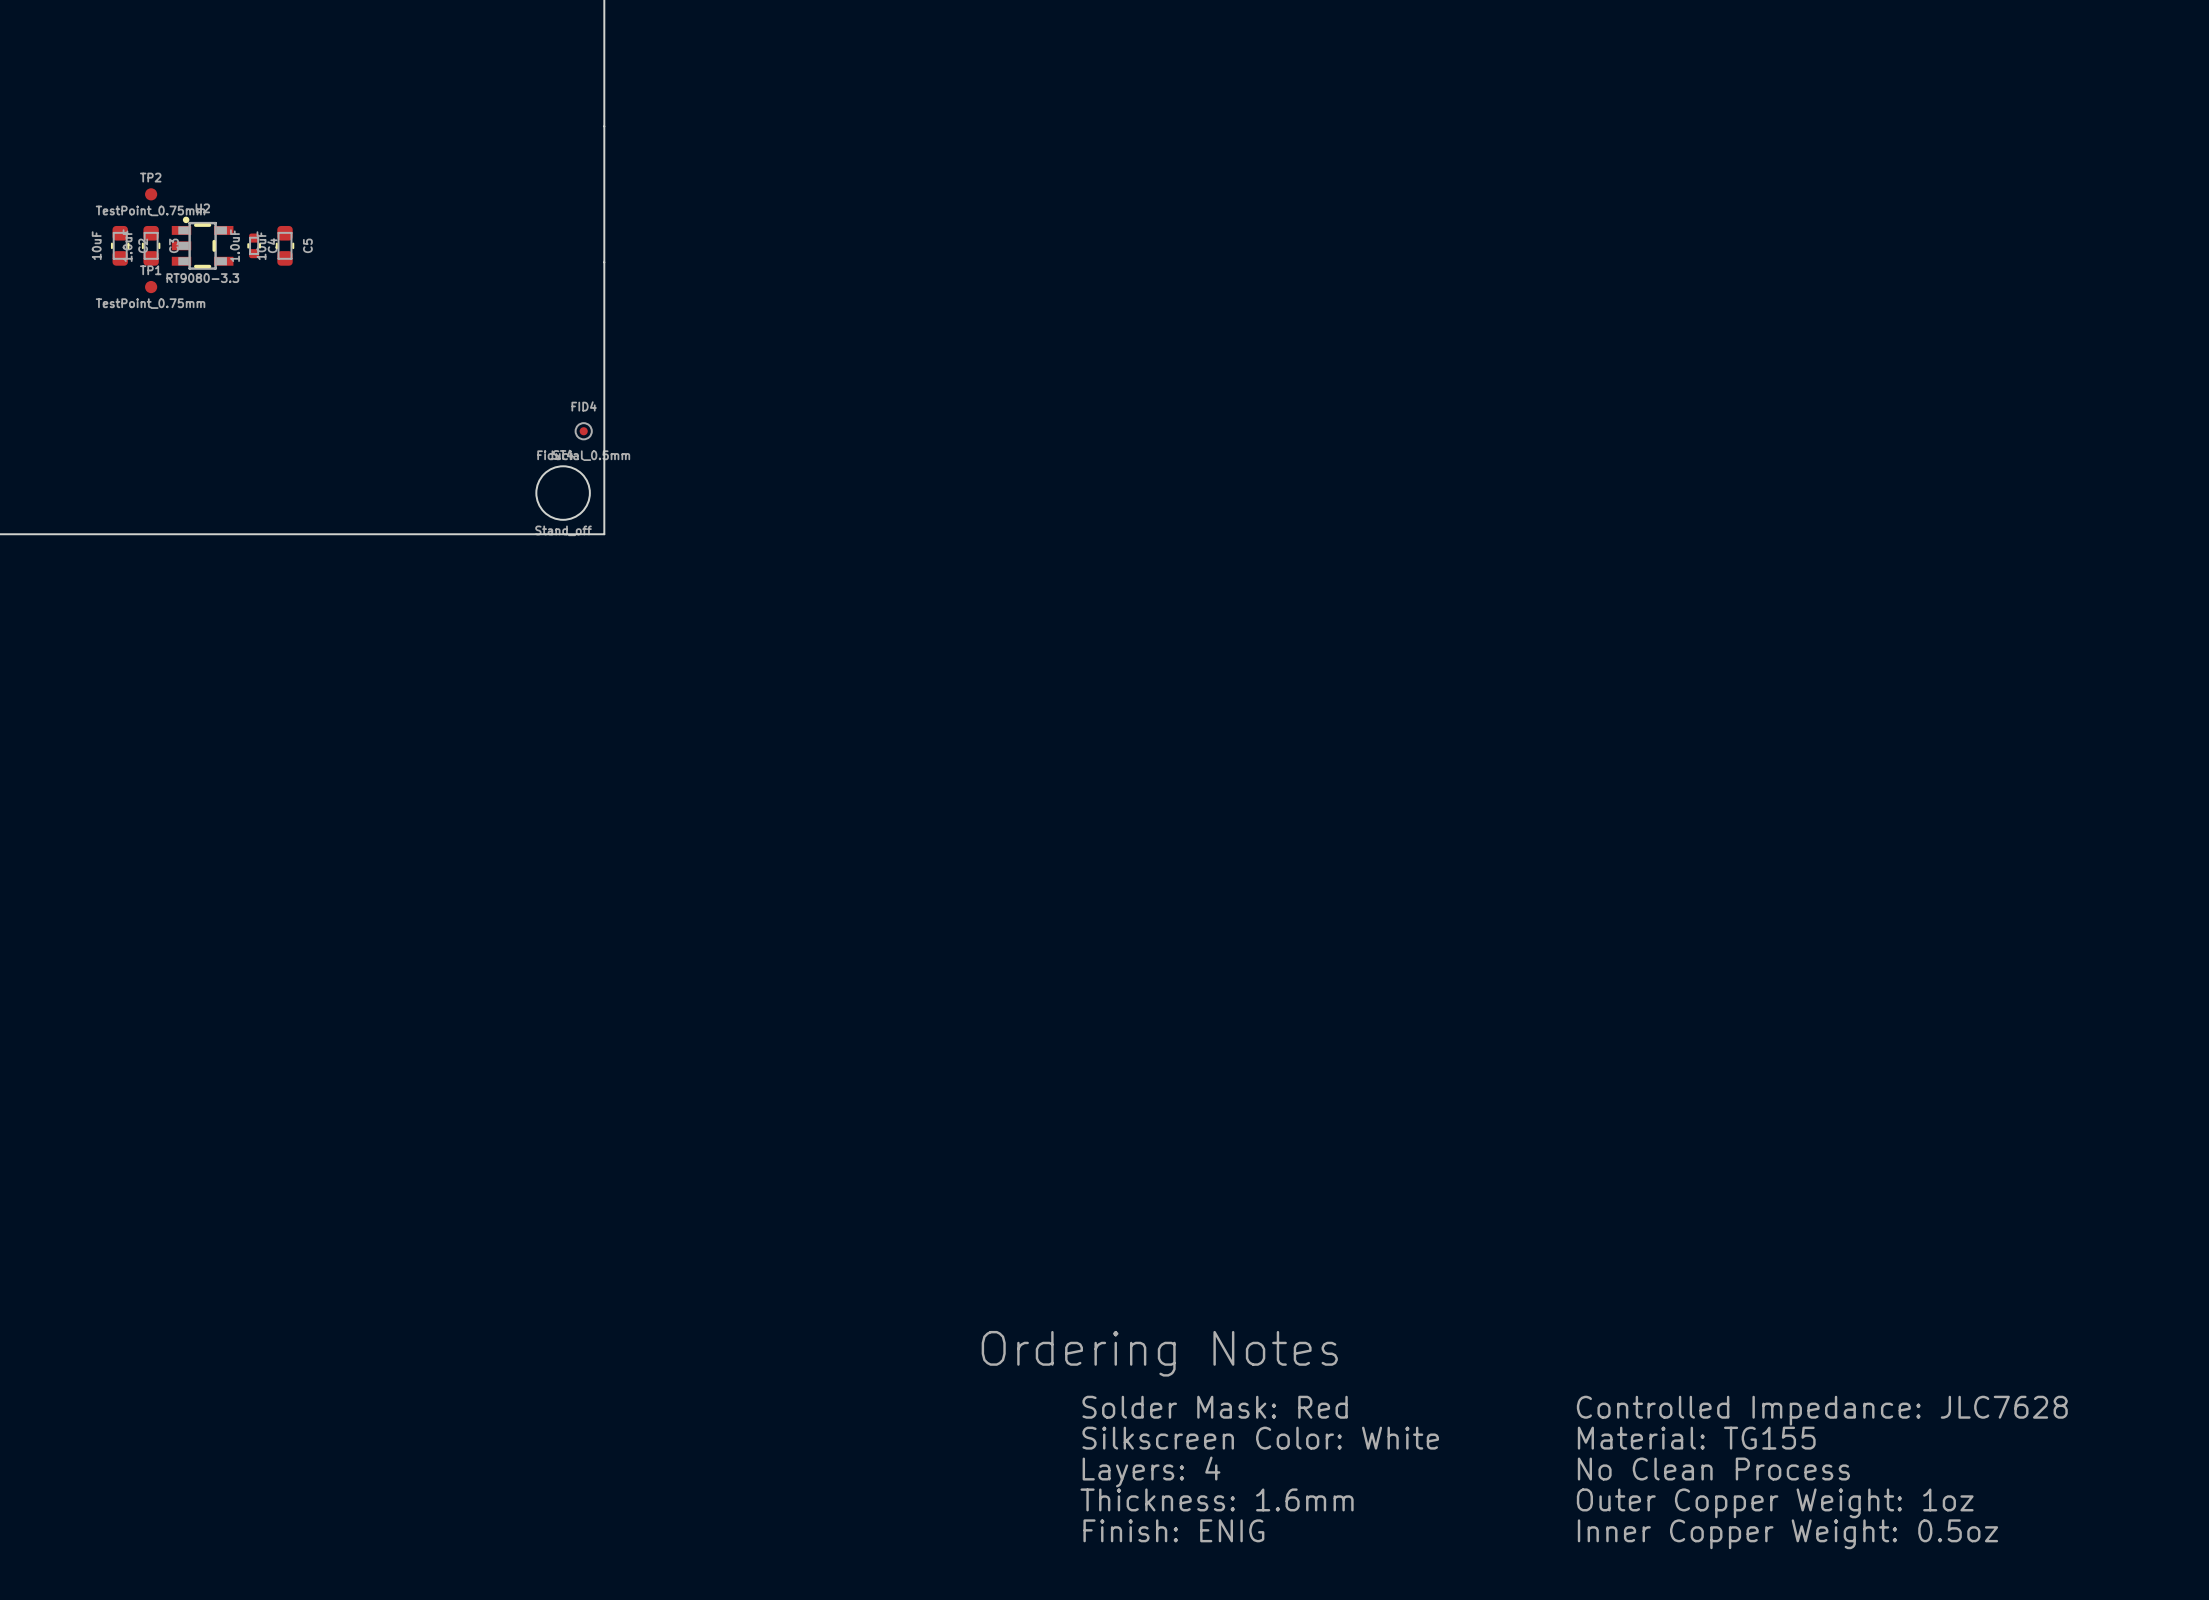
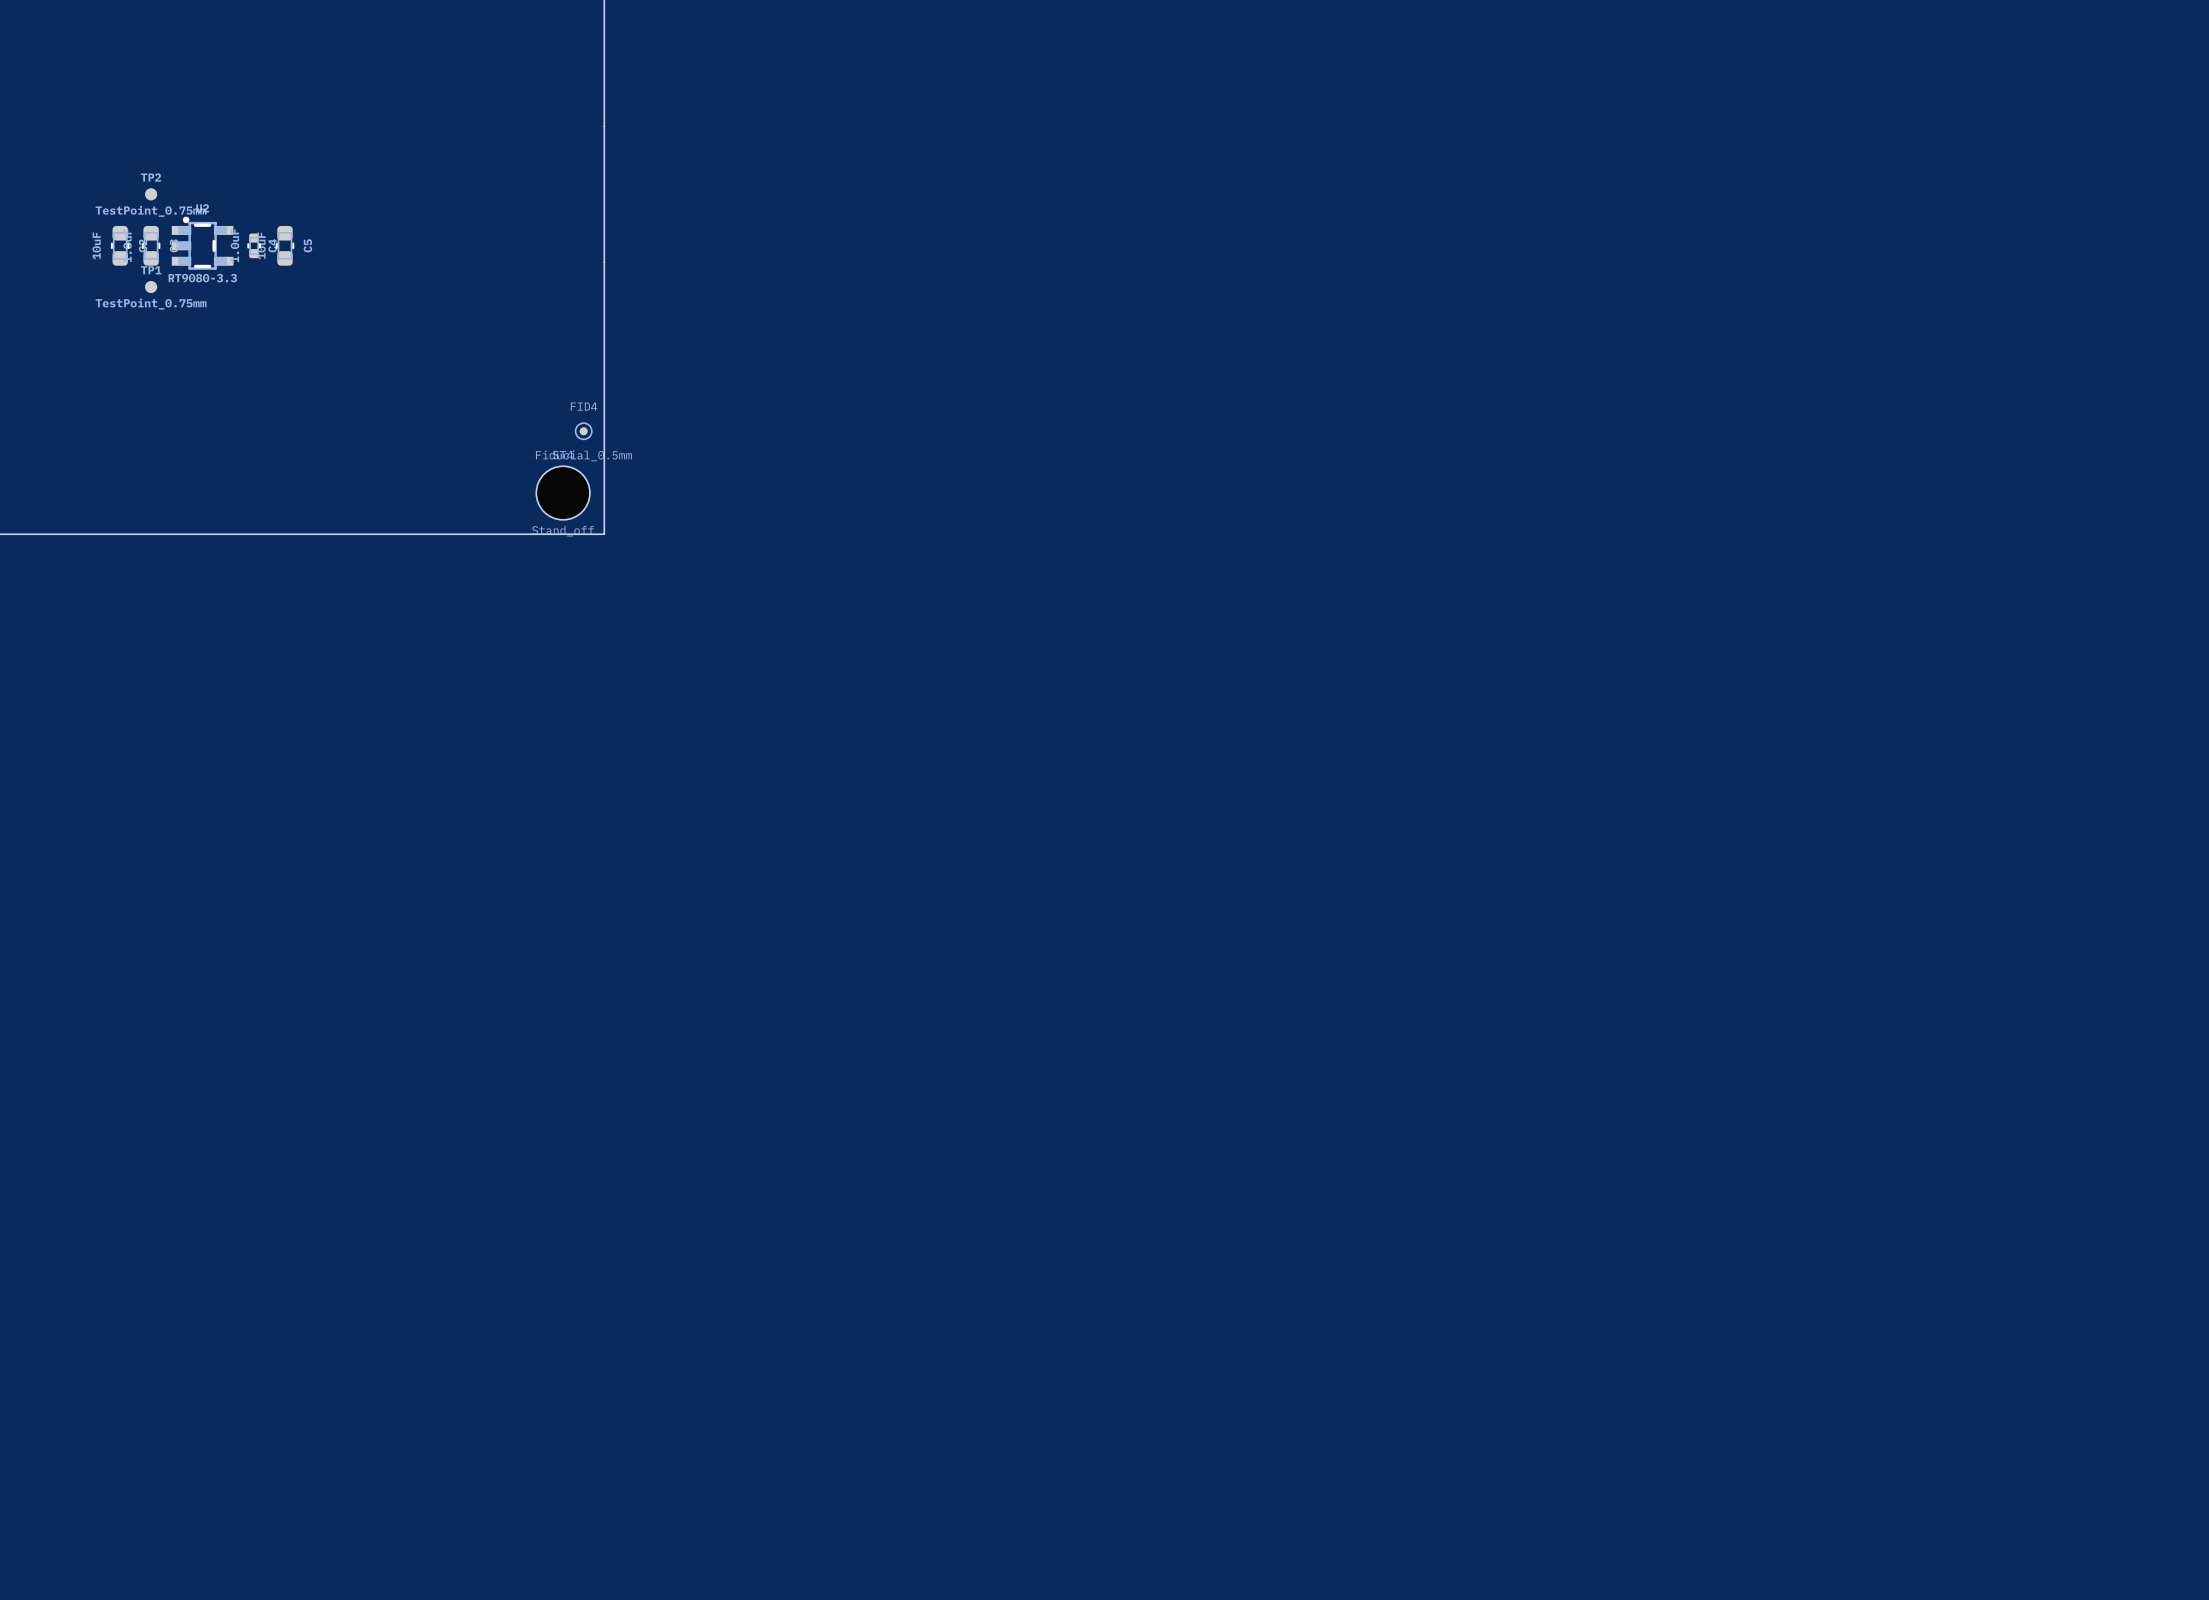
text: Ordering Notes (1159, 1353) -> none
text: Solder Mask: Red (1215, 1407) -> none
text: Controlled Impedance: JLC7628 (1822, 1410) -> none
text: Silkscreen Color: White (1260, 1438) -> none
text: Material: TG155 (1696, 1438) -> none
text: No Clean Process (1713, 1469) -> none
text: Layers: 4 (1151, 1471) -> none
text: Thickness: 1.6mm (1217, 1499) -> none
text: Outer Copper Weight: 1oz (1775, 1503) -> none
text: Finish: ENIG (1173, 1530) -> none
text: Inner Copper Weight: 0.5oz (1787, 1534) -> none

